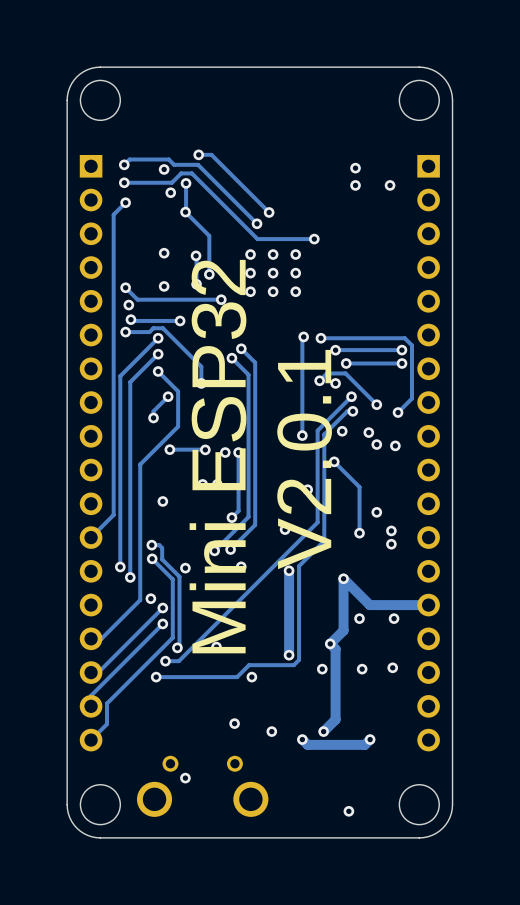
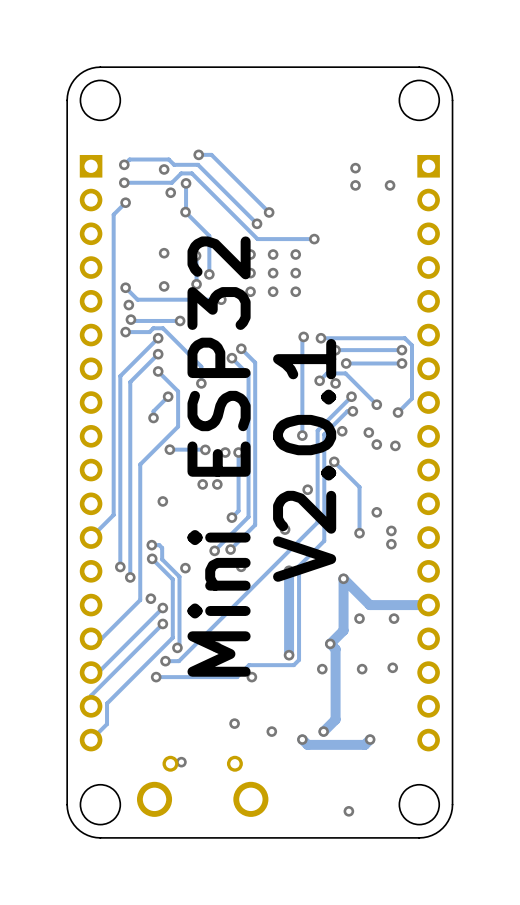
via position: (185, 778) -> (181, 762)

